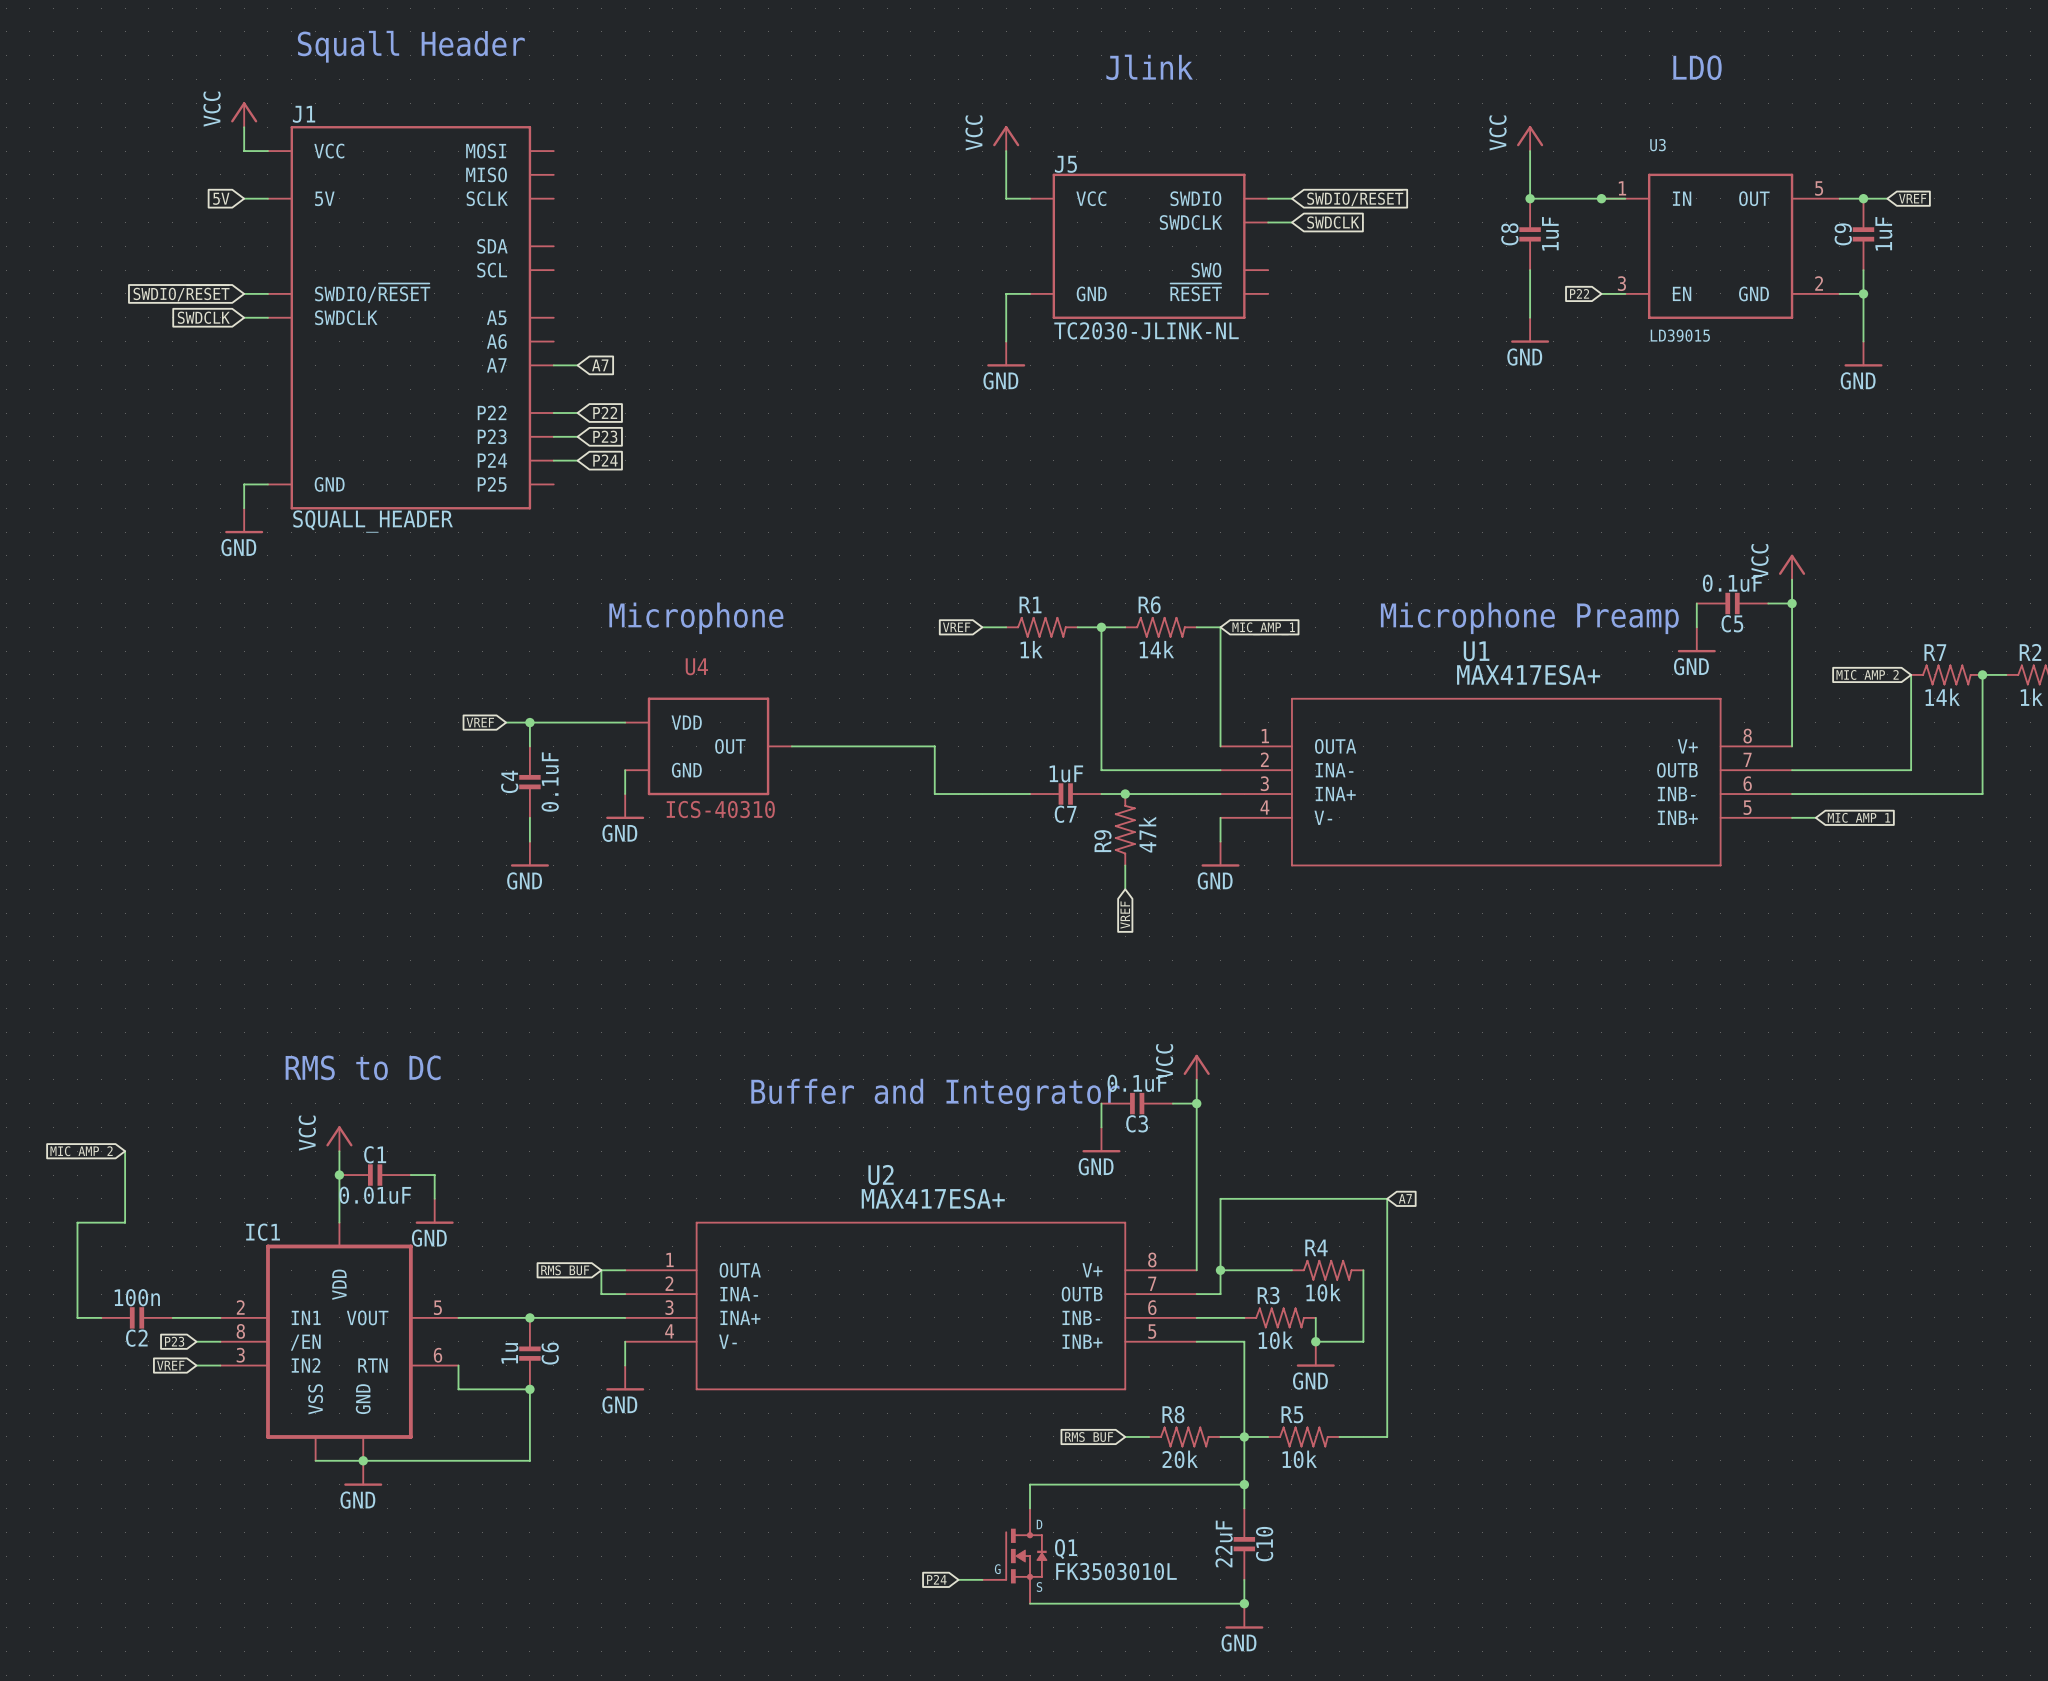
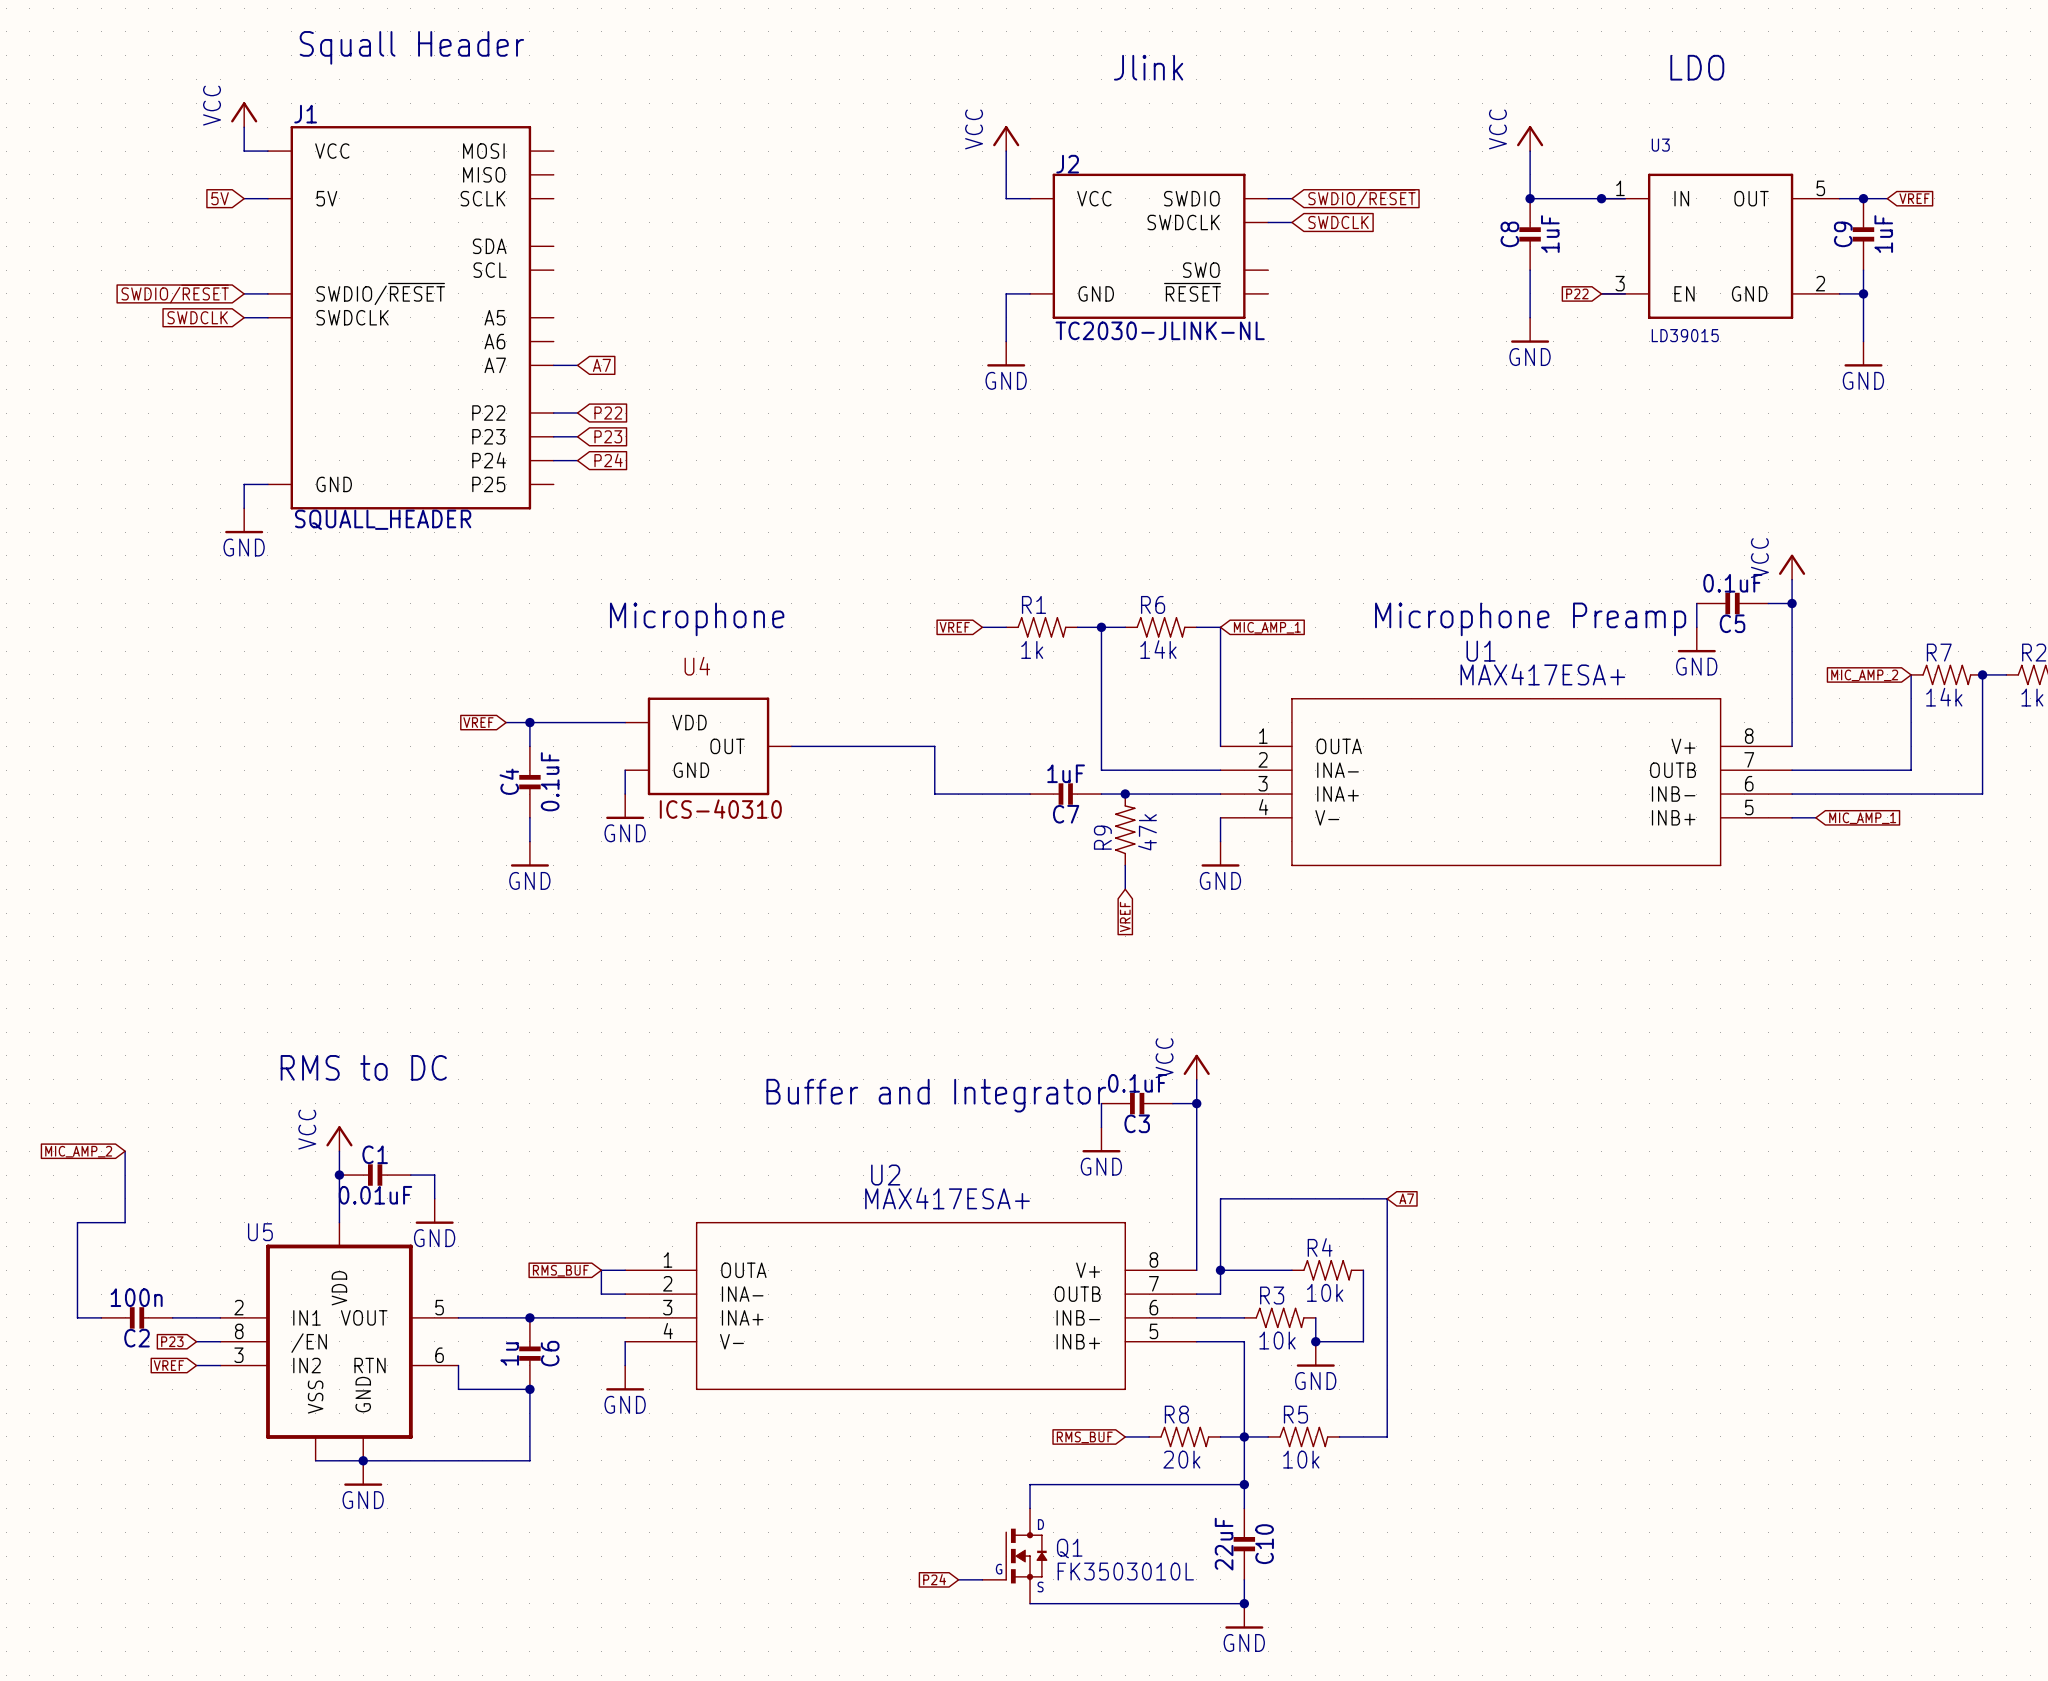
J5 name: J5 (1065, 164) -> J2 (1067, 164)
IC1 name: IC1 (263, 1232) -> U5 (260, 1232)

